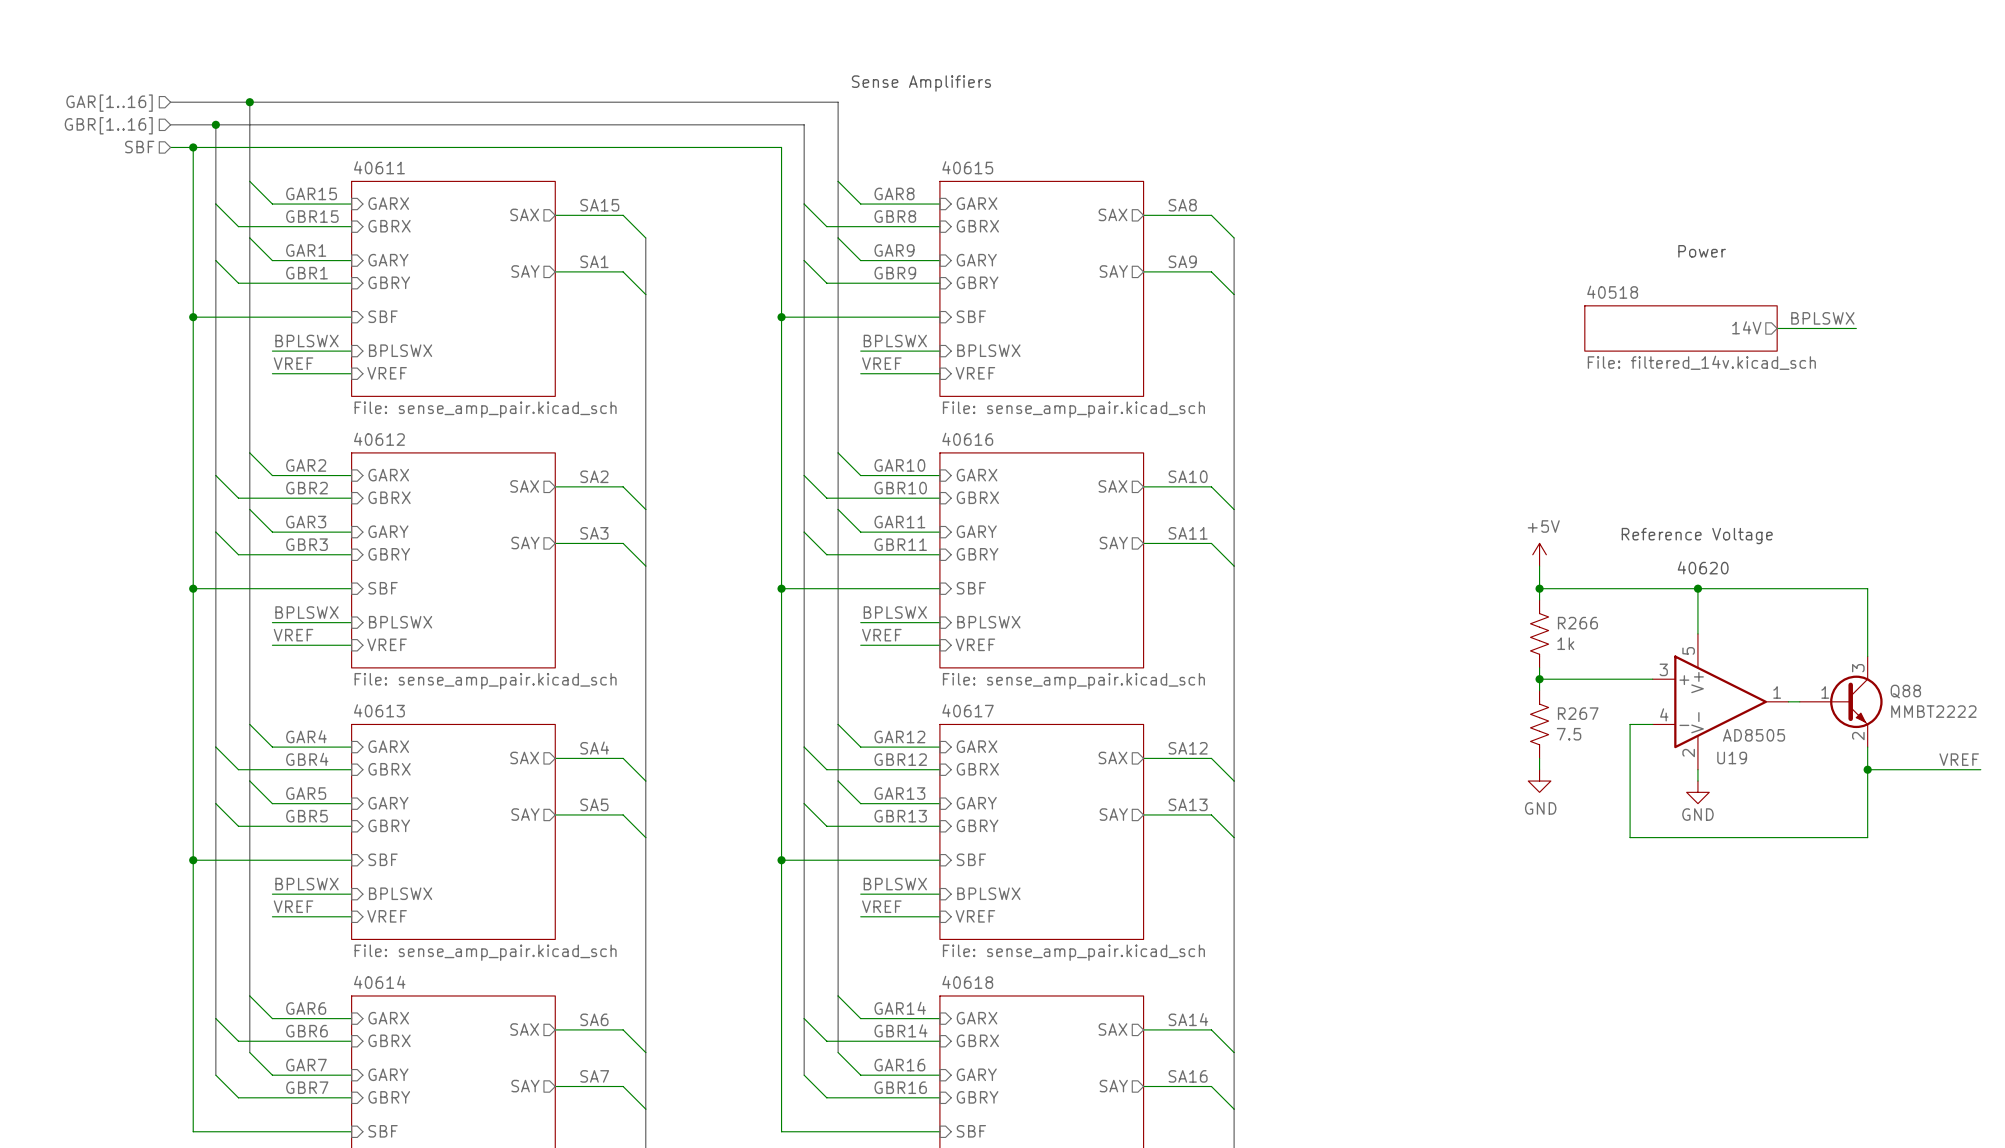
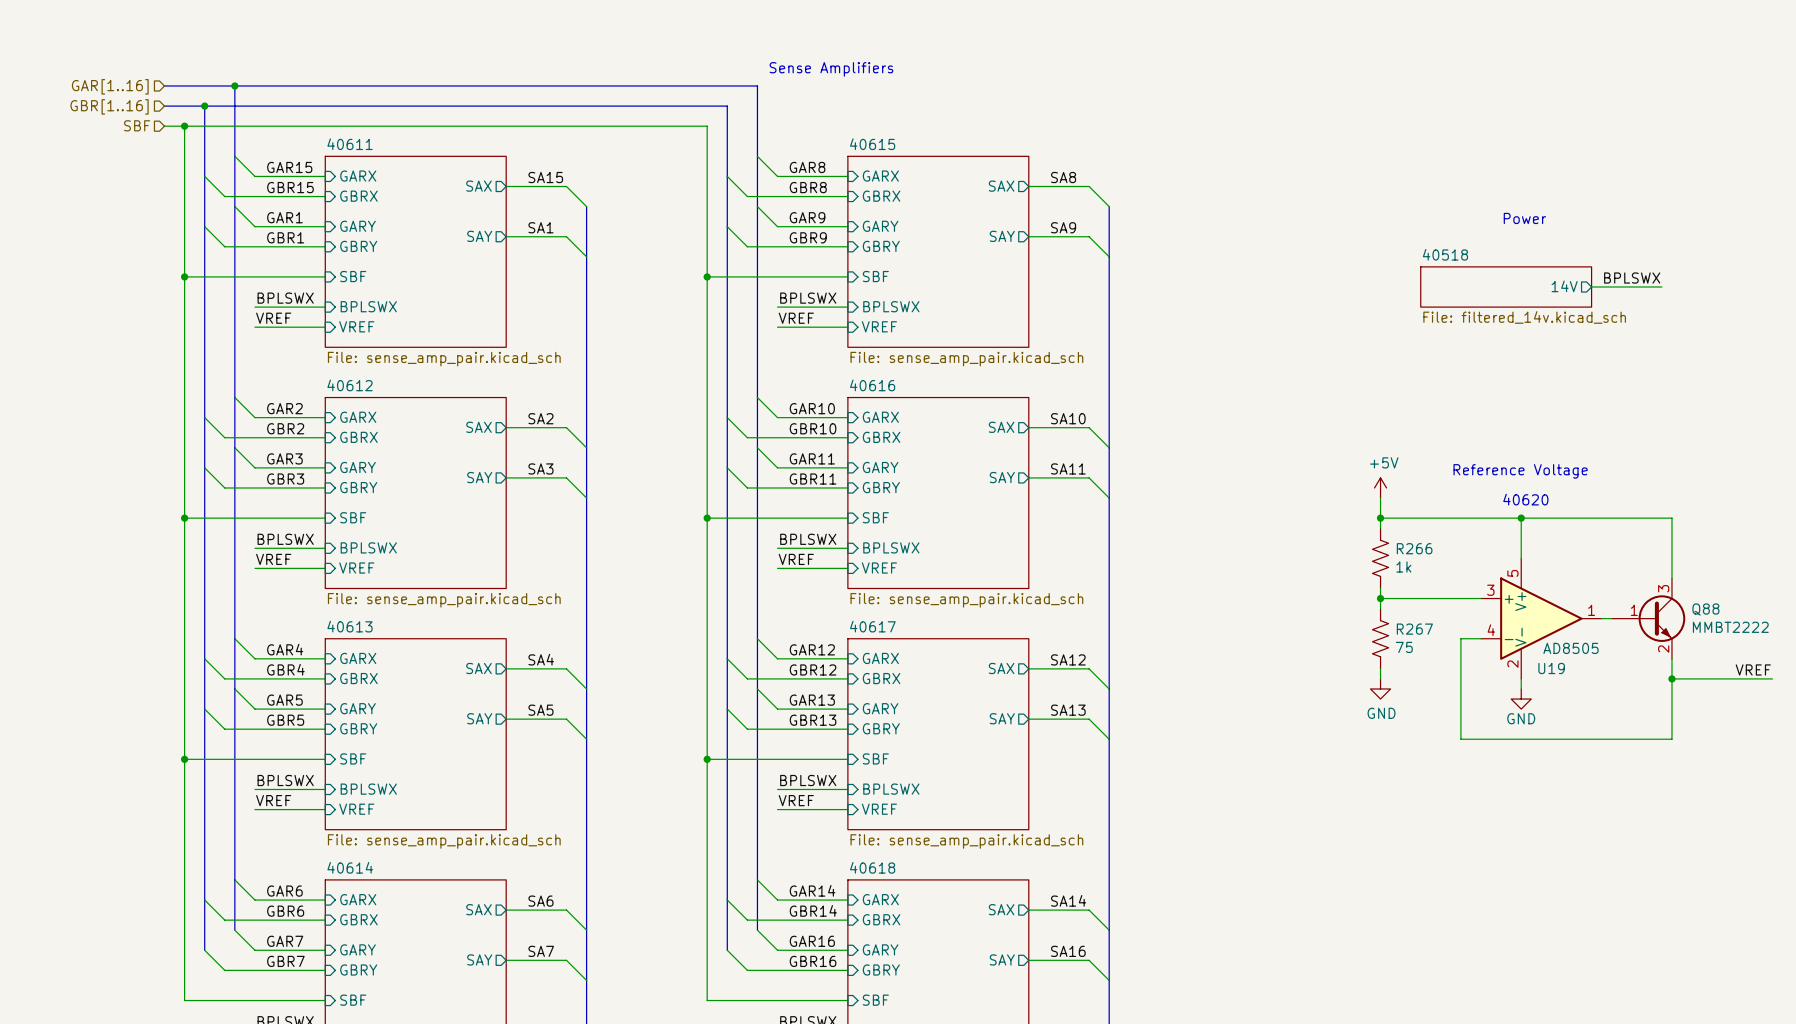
R267 value: 7.5 (1569, 734) -> 75 (1404, 647)

